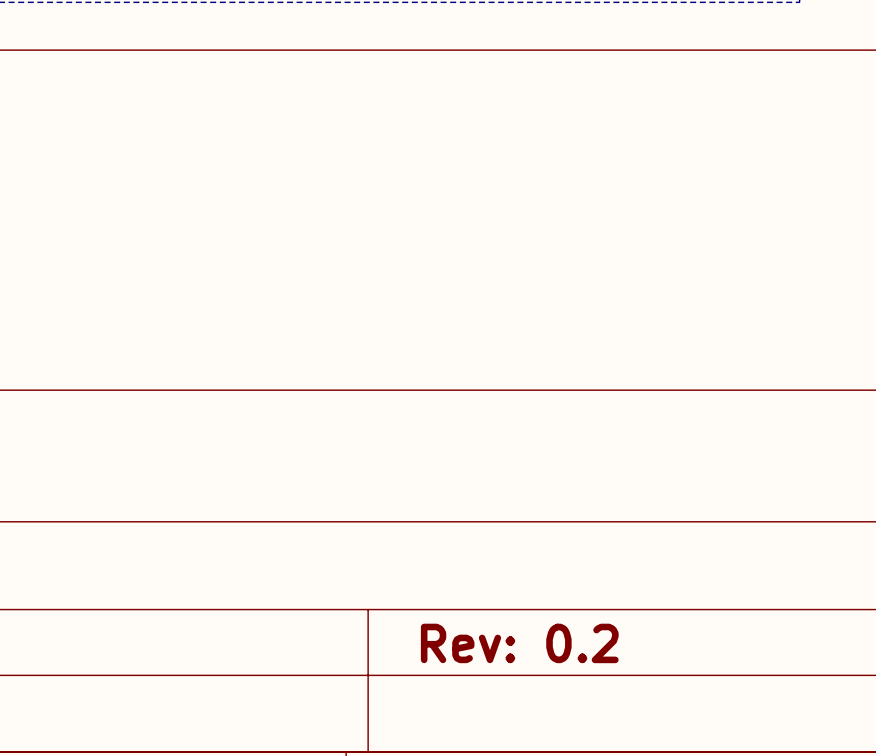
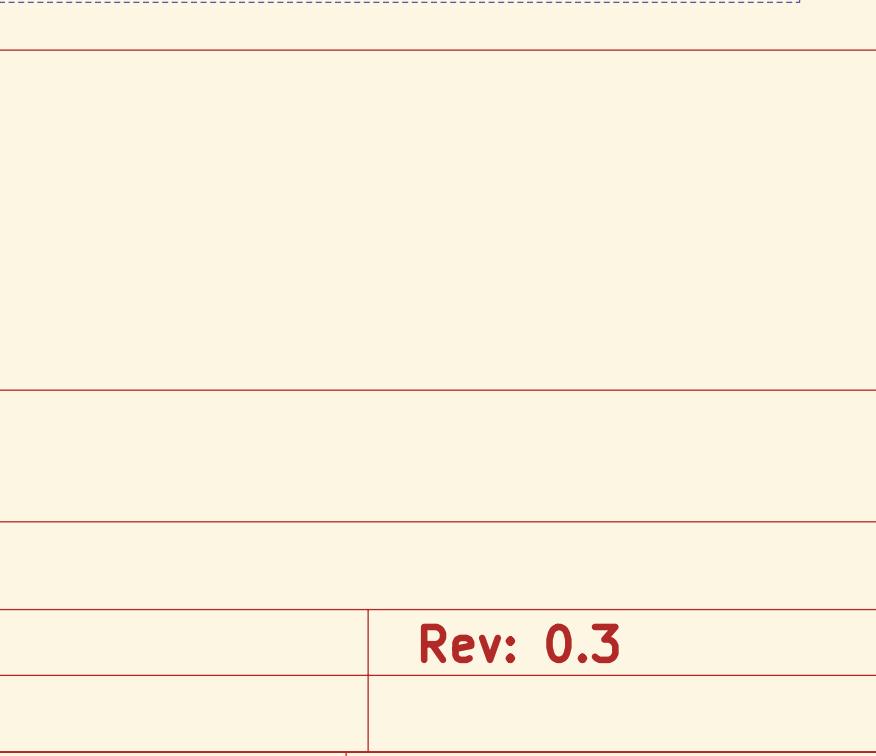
title block: Rev: 0.2 (519, 643) -> Rev: 0.3 (519, 643)

